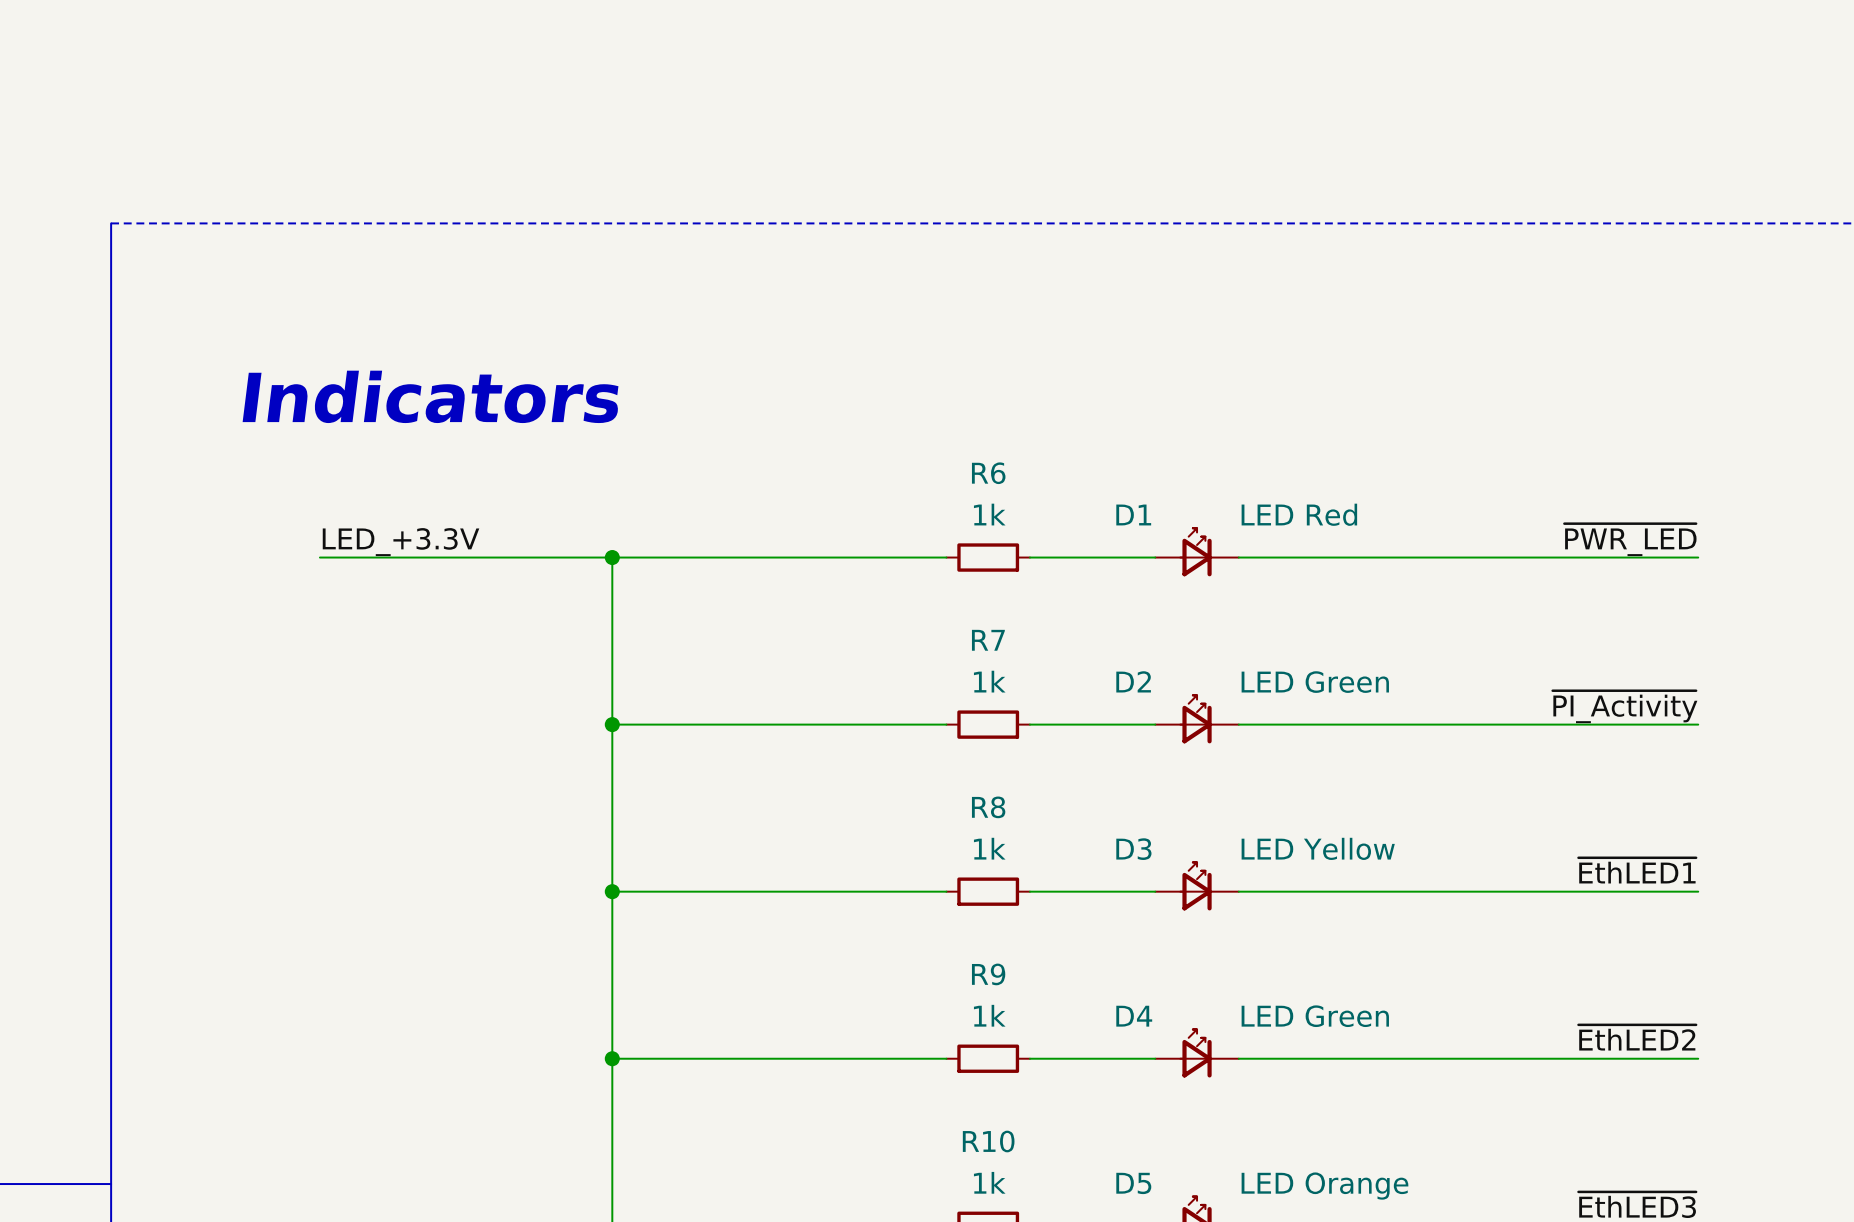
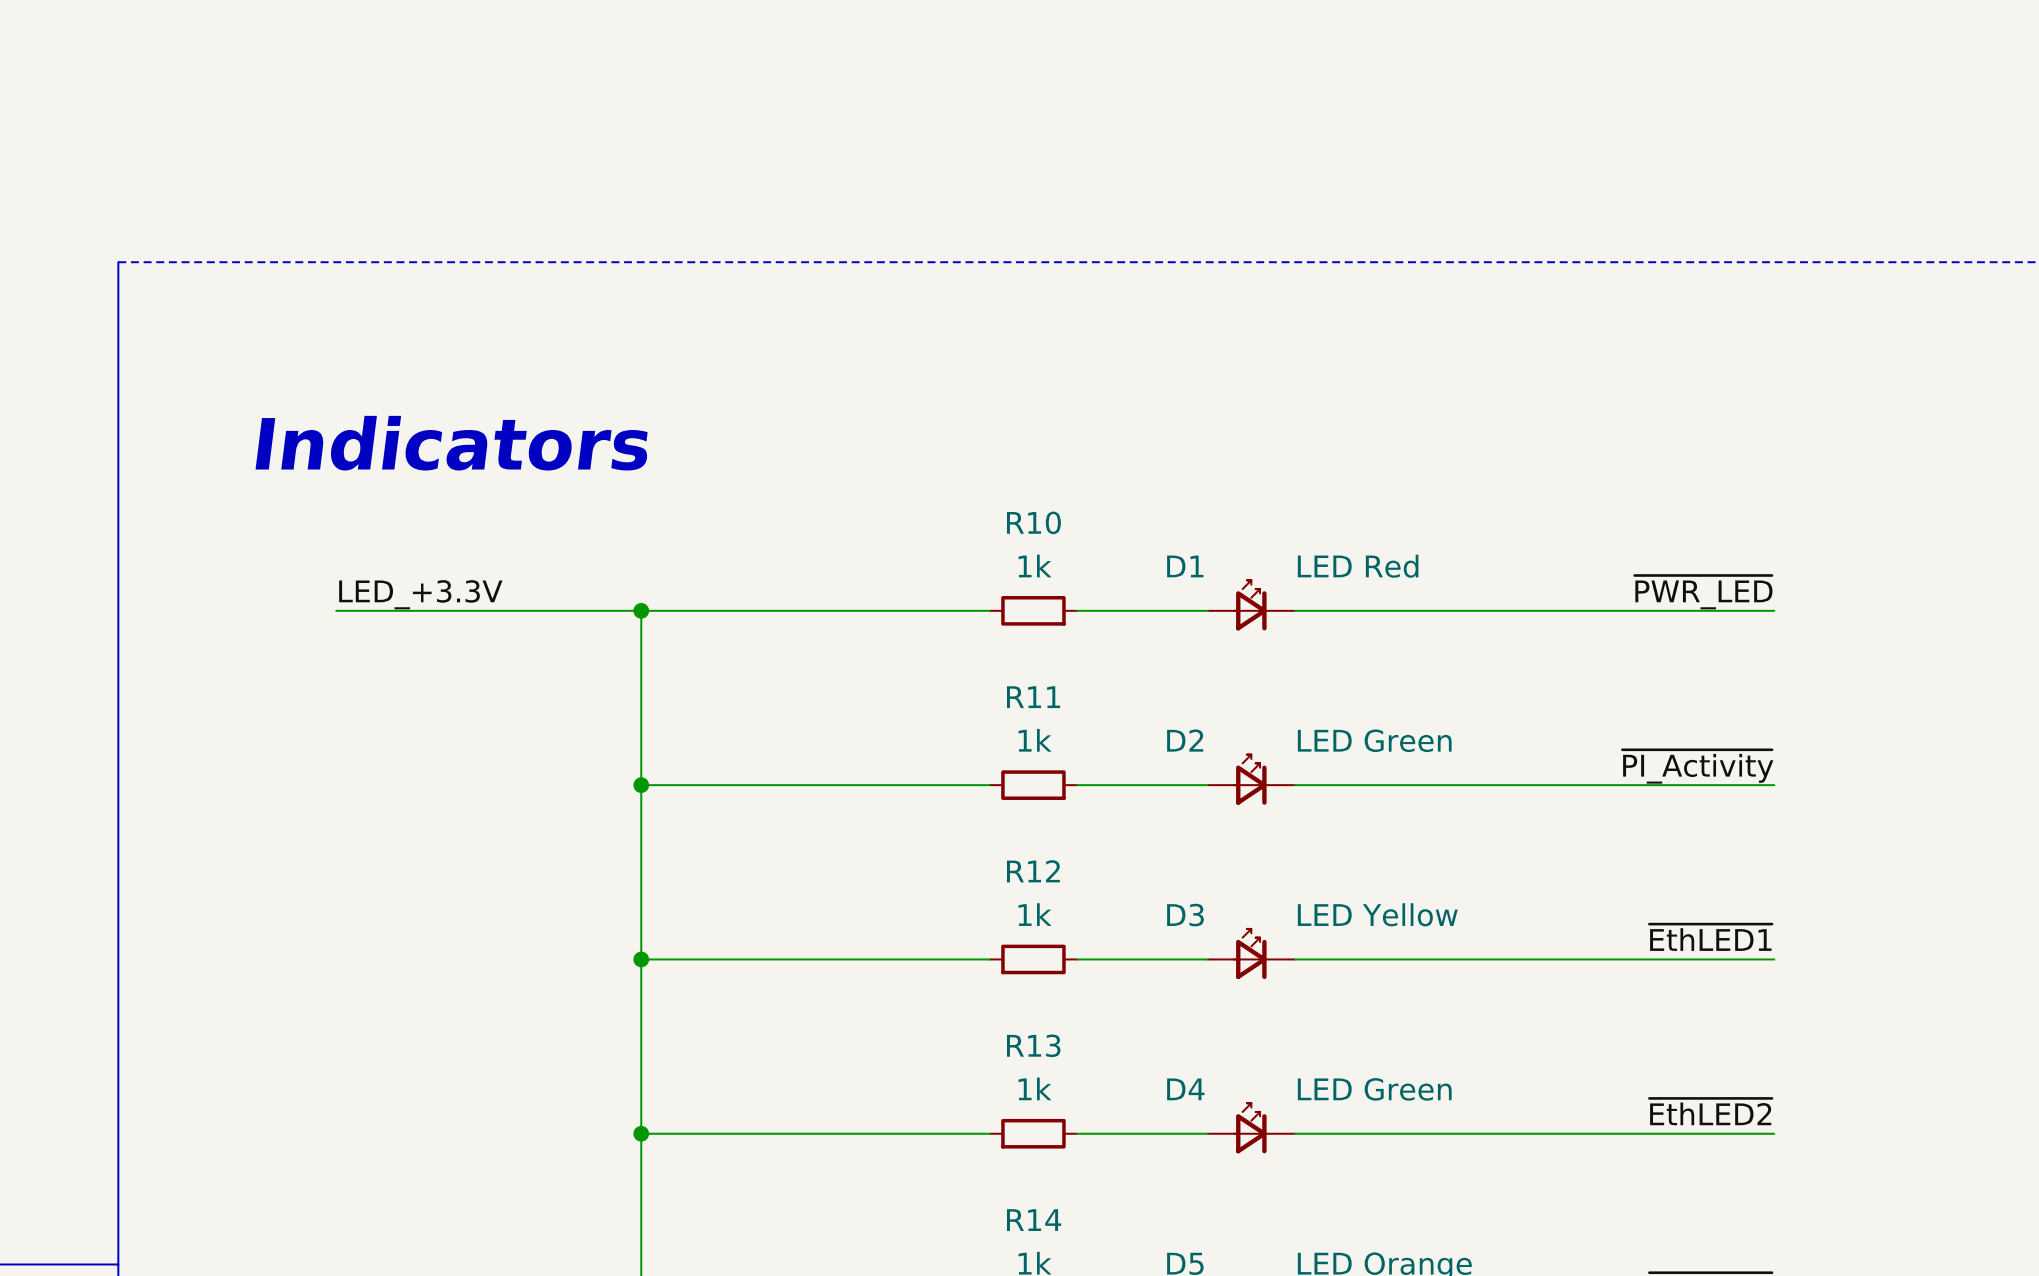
R6 name: R6 (988, 473) -> R10 (1033, 522)
R7 name: R7 (988, 640) -> R11 (1033, 697)
R8 name: R8 (988, 807) -> R12 (1033, 871)
R9 name: R9 (988, 974) -> R13 (1033, 1045)
R10 name: R10 (988, 1141) -> R14 (1034, 1220)

